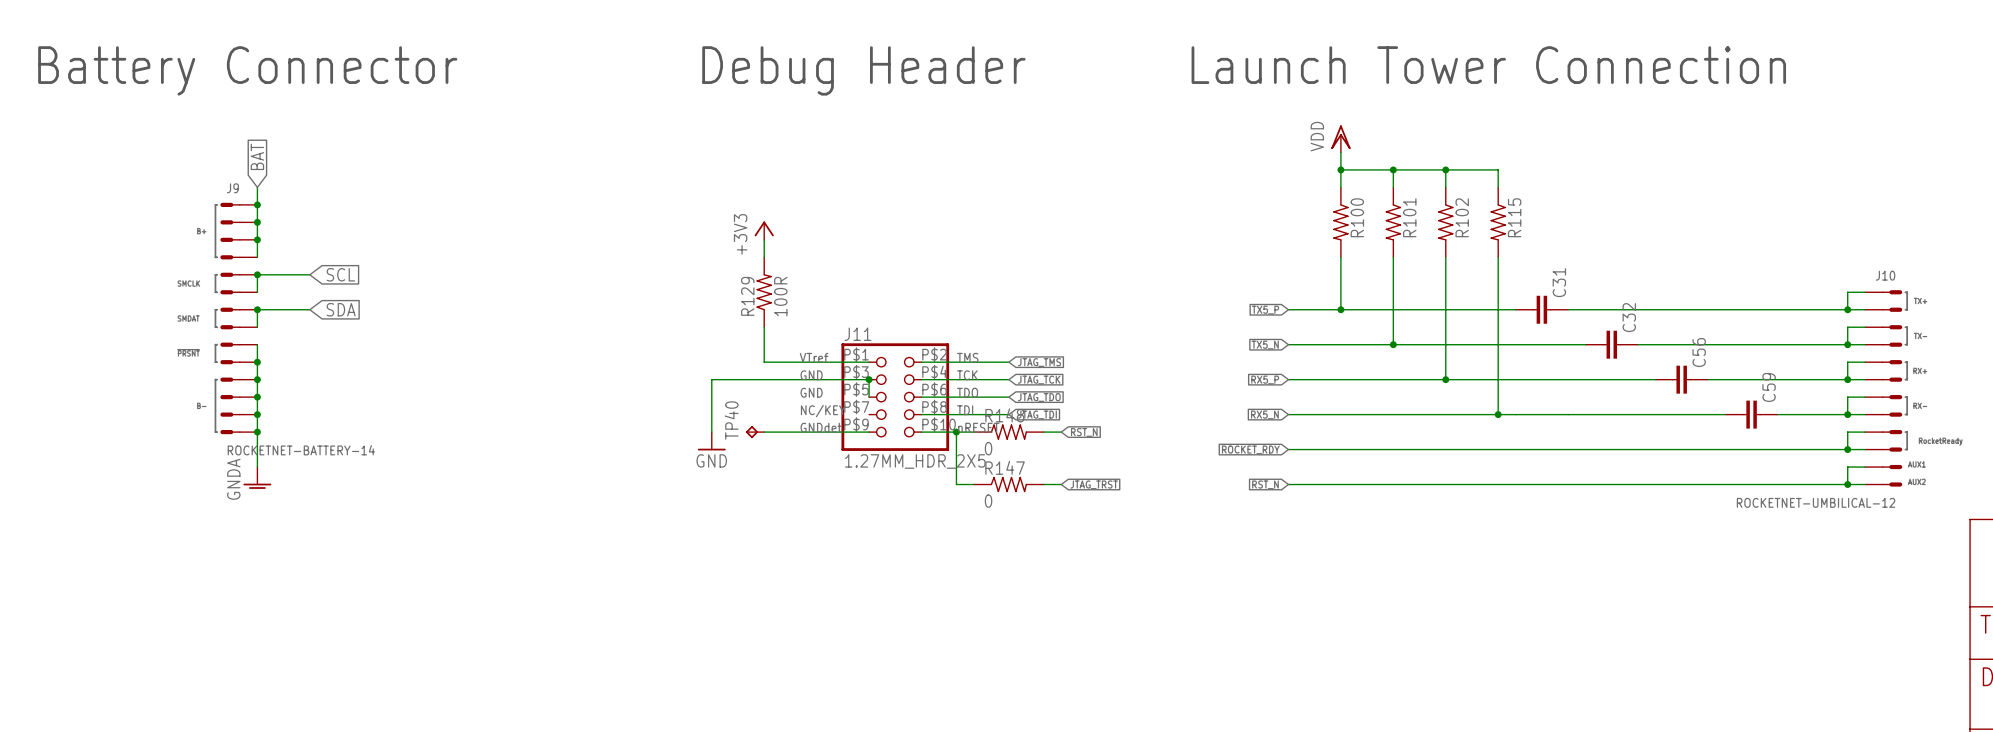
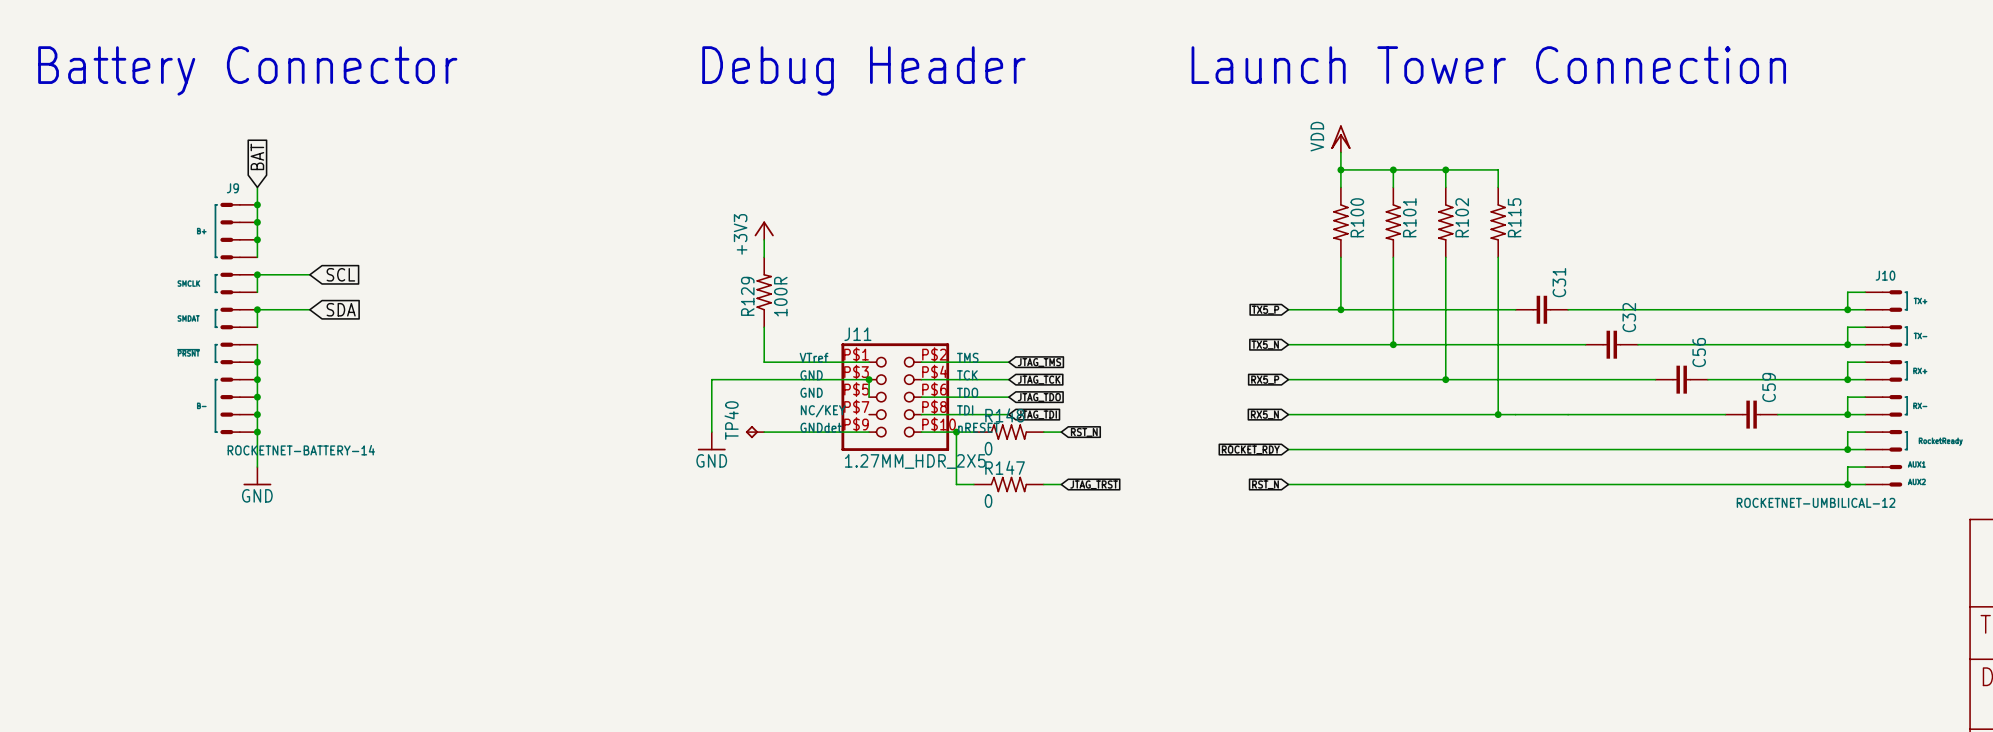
power symbol: GNDA (257, 477) -> GND (257, 476)

